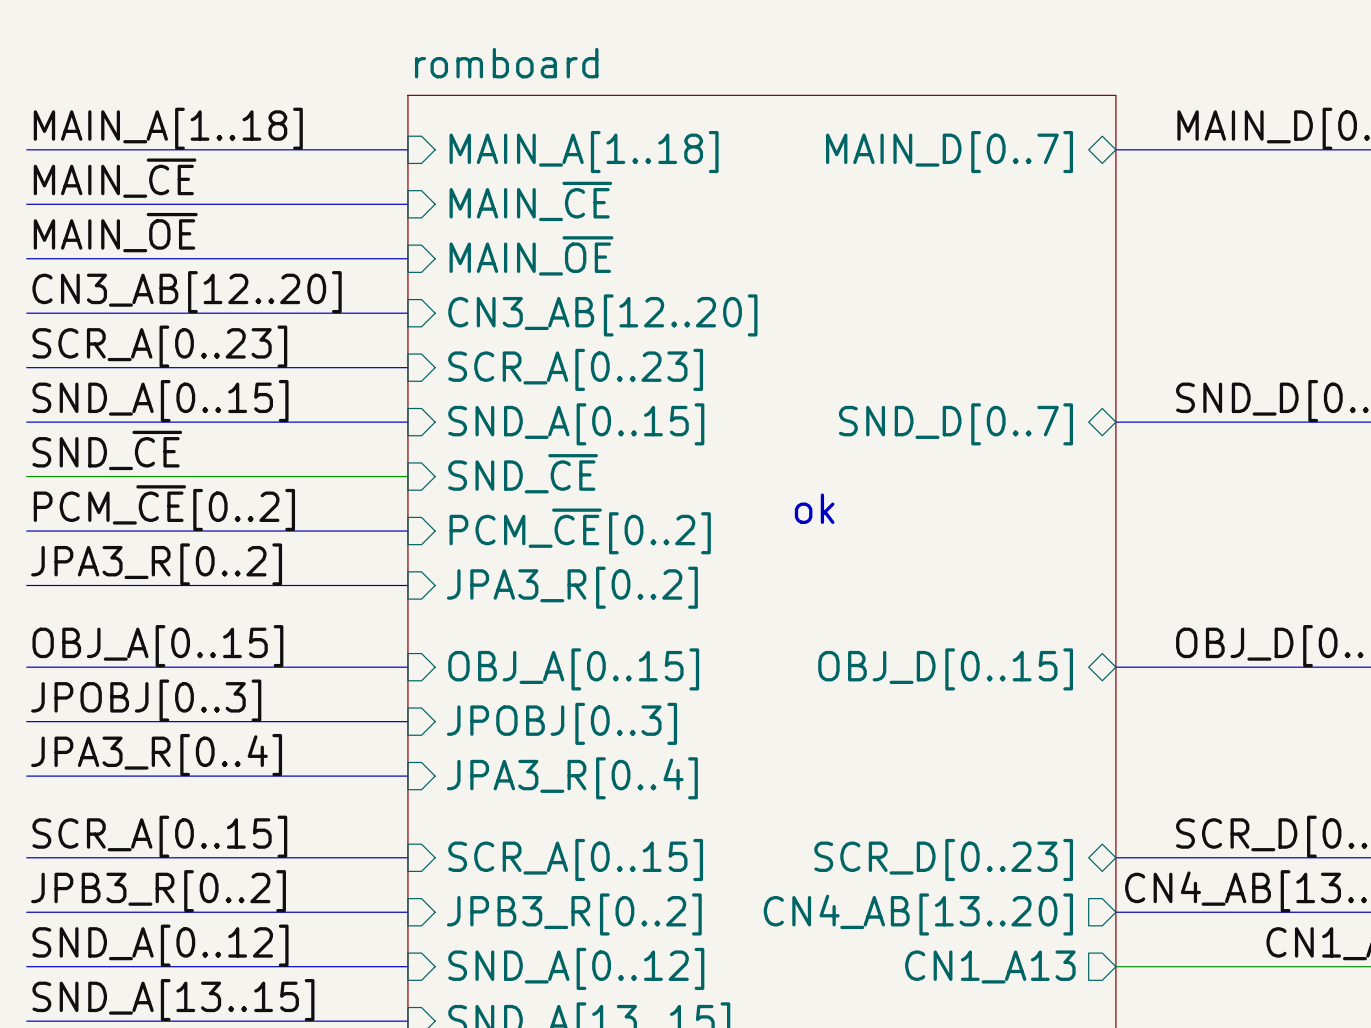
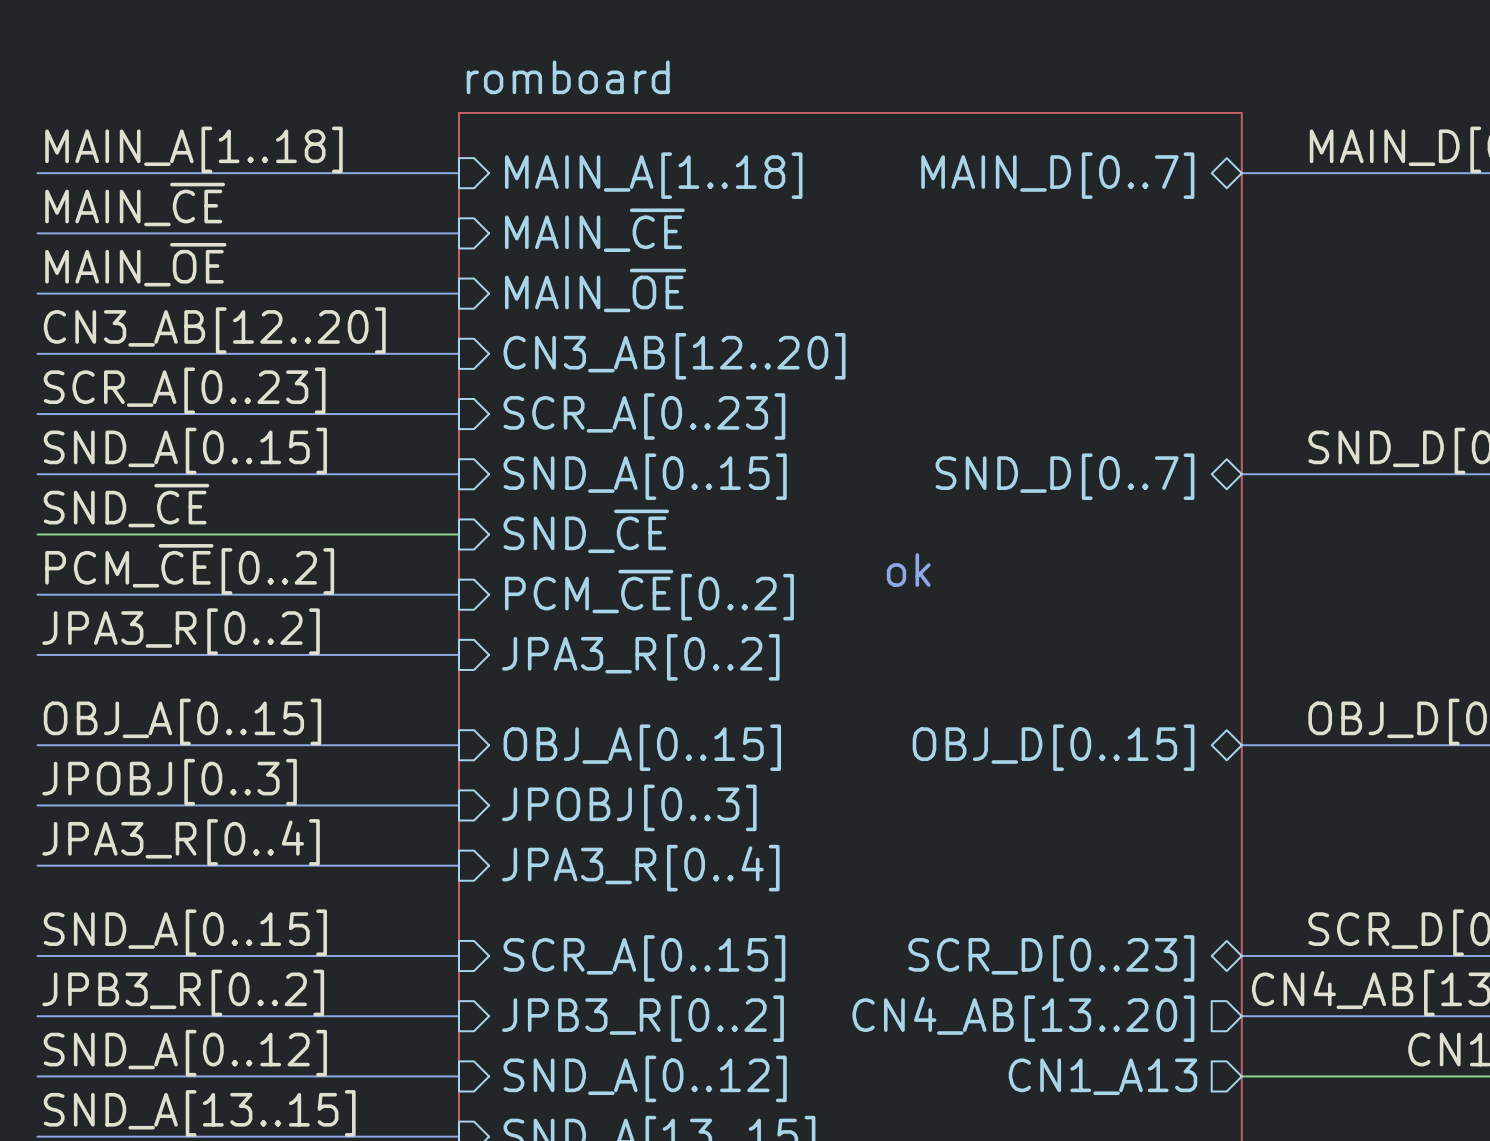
label: SCR_A[0..15] (159, 836) -> SND_A[0..15] (185, 932)

